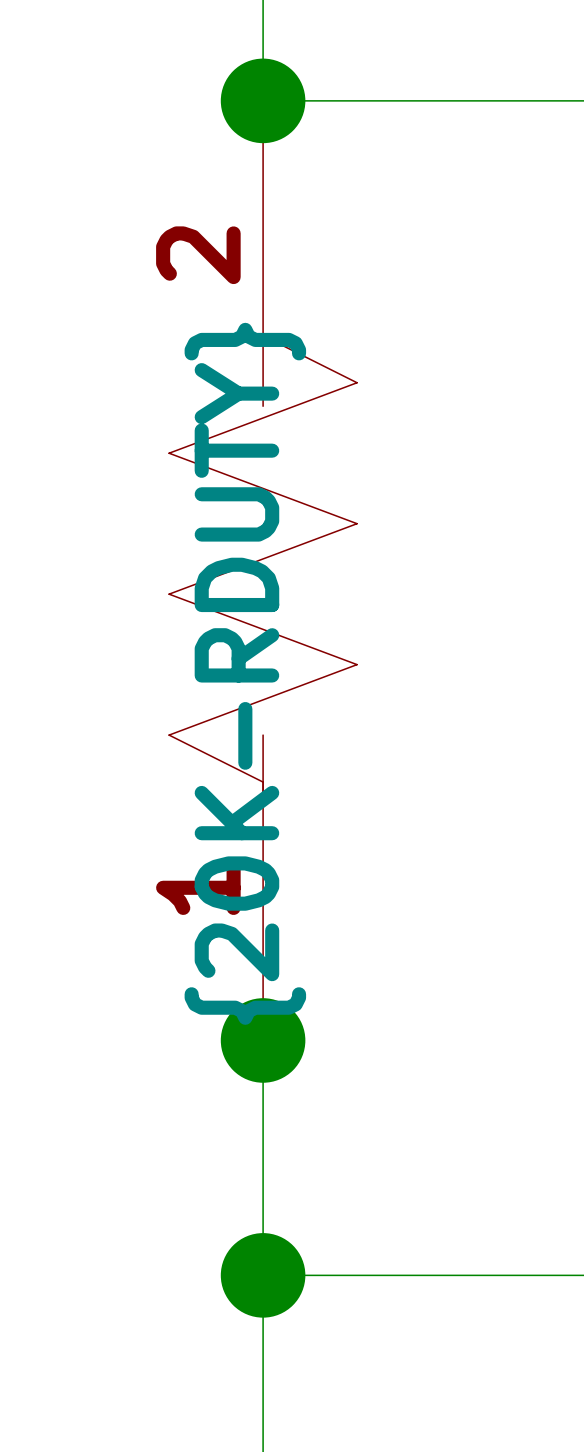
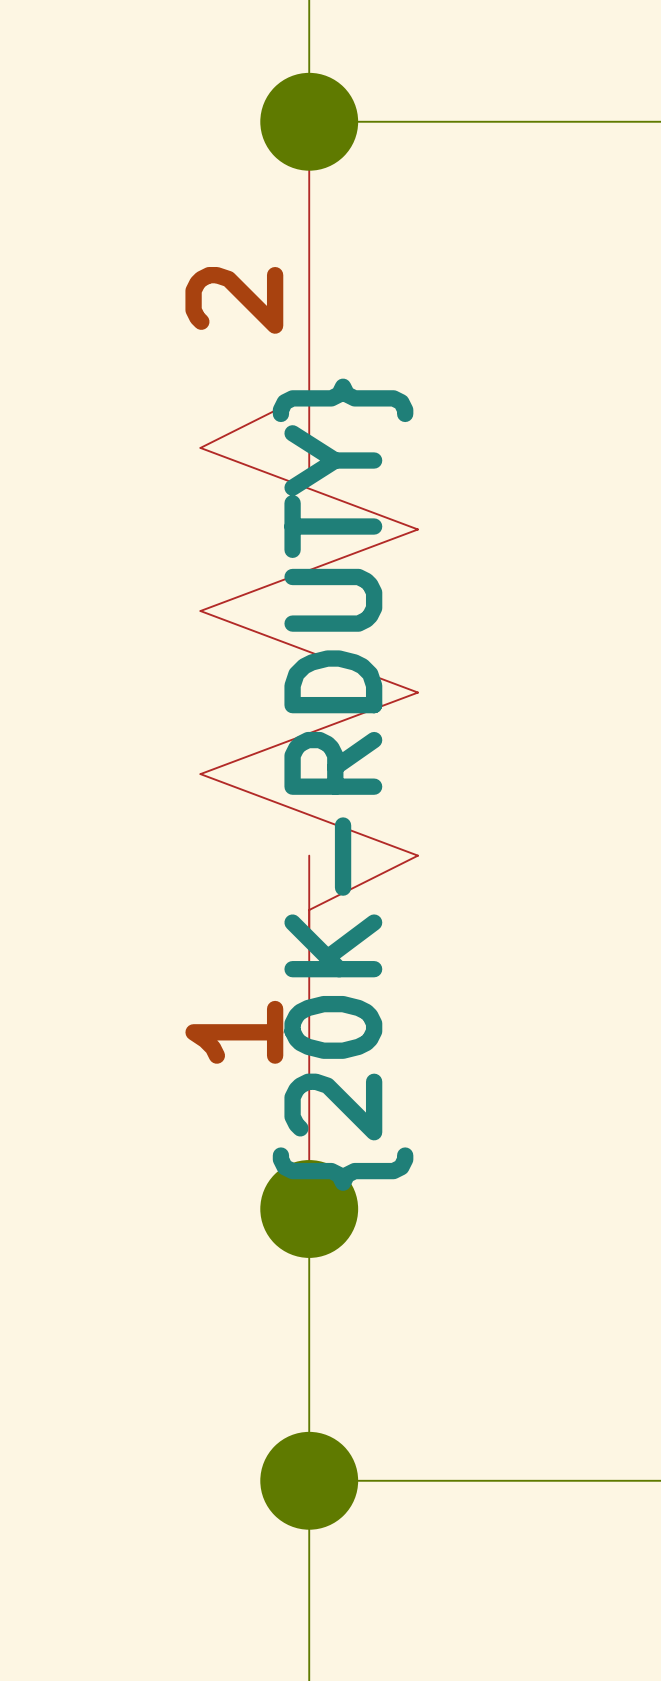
part flip: as is (263, 570) -> left-right (309, 665)

